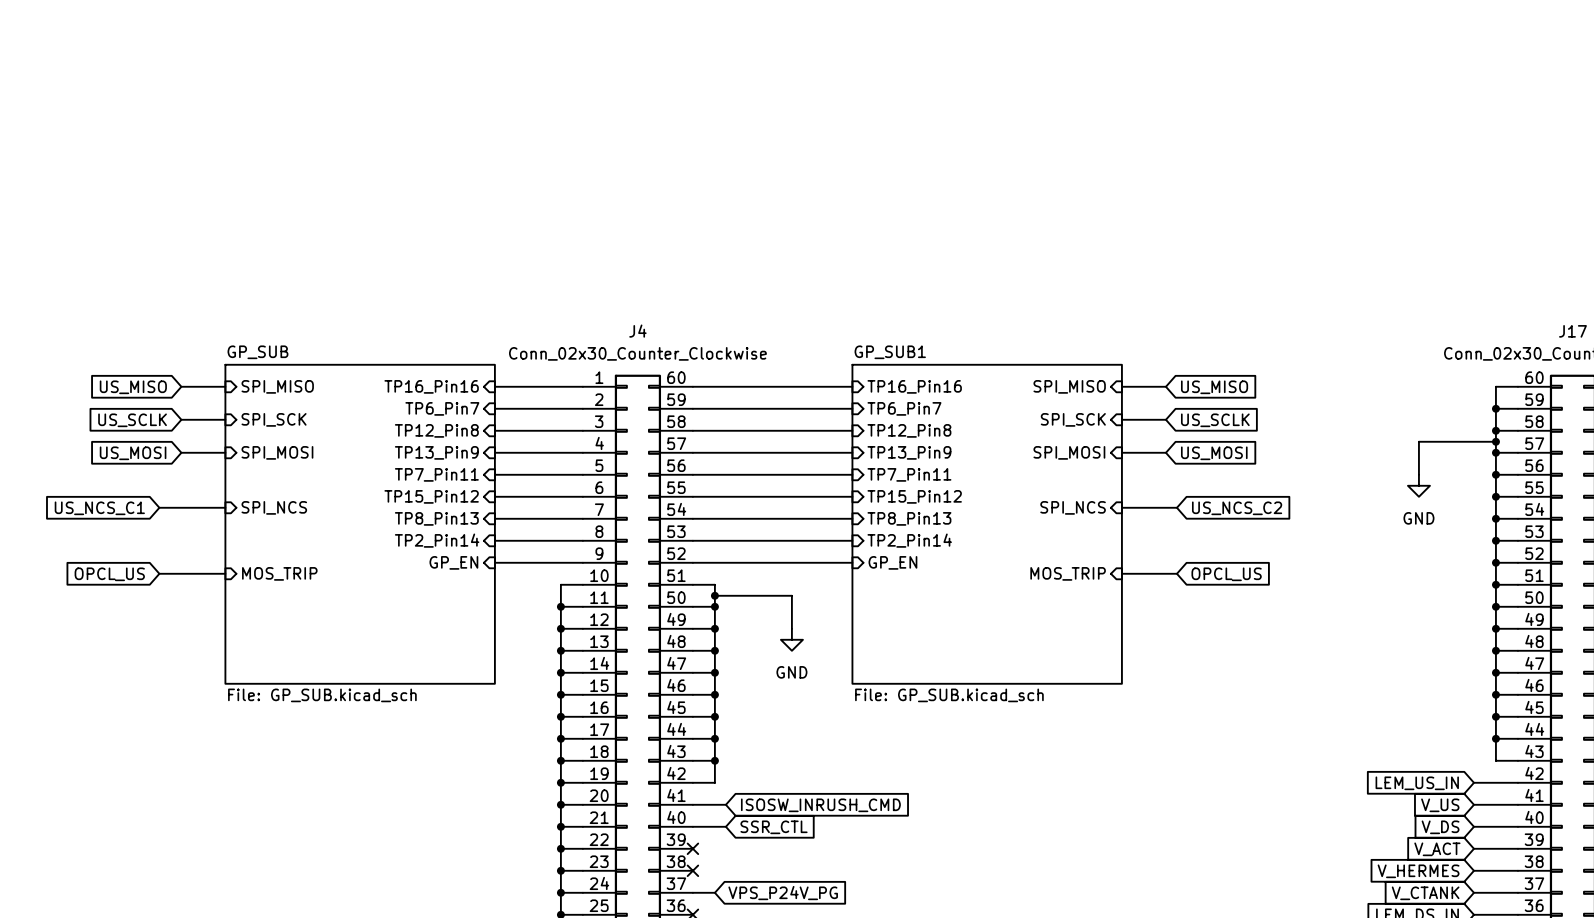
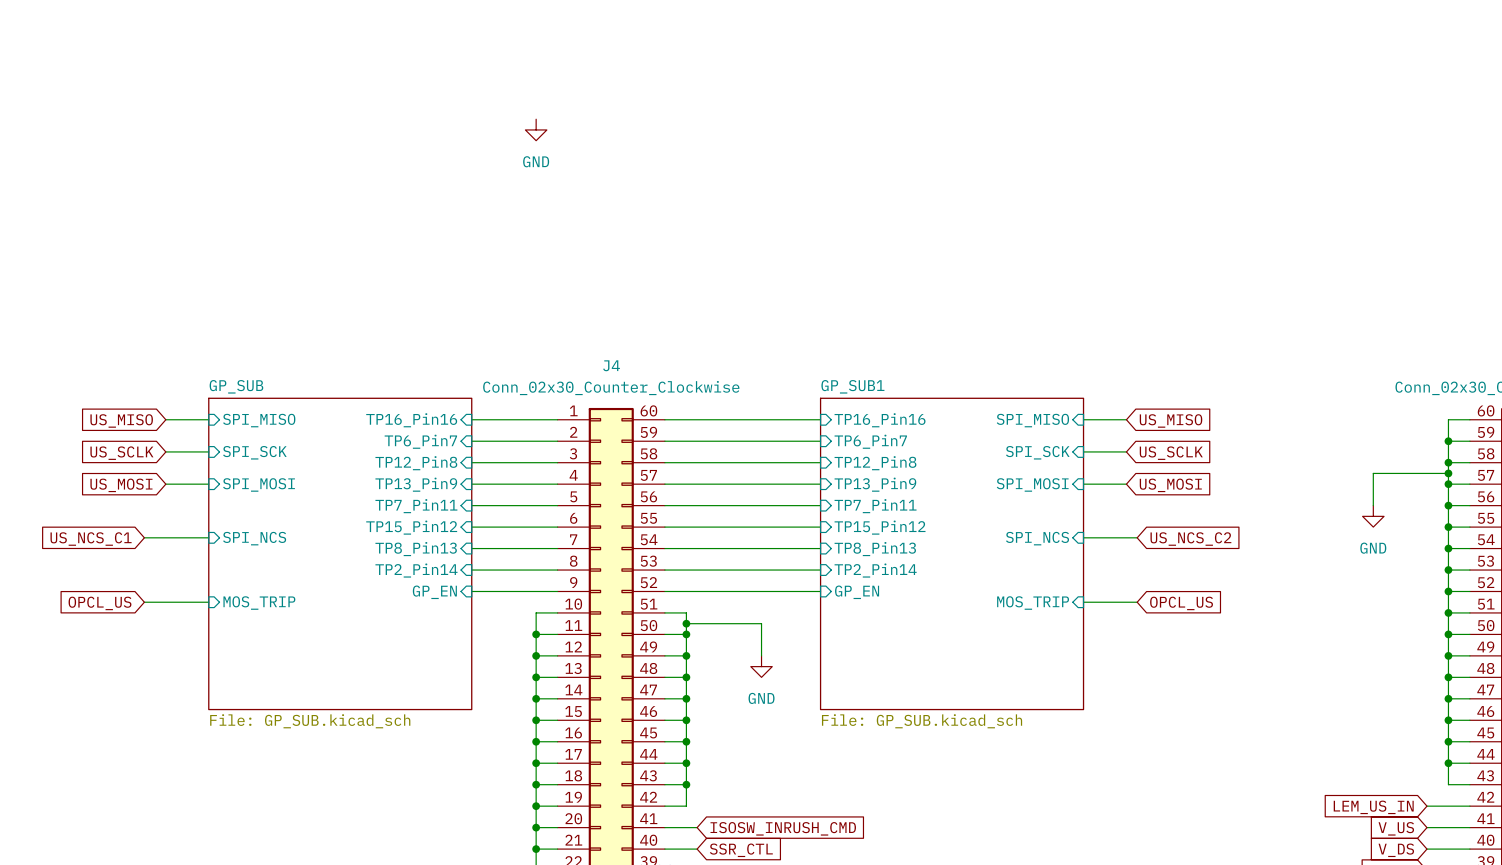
power symbol: none -> GND (536, 129)

